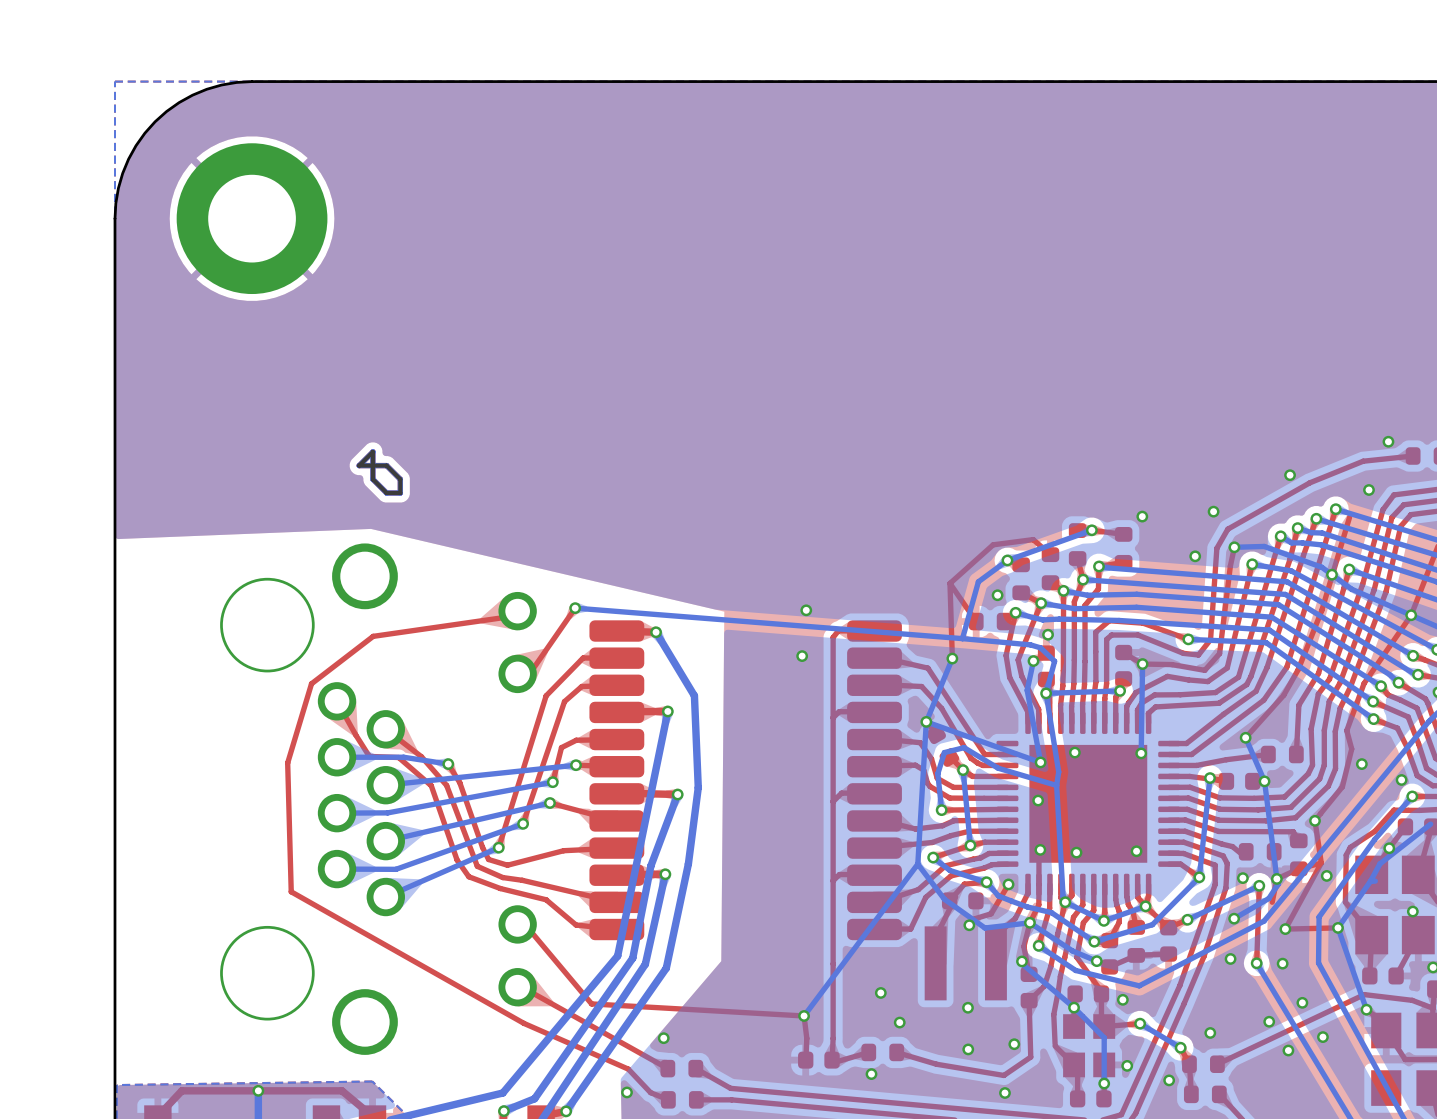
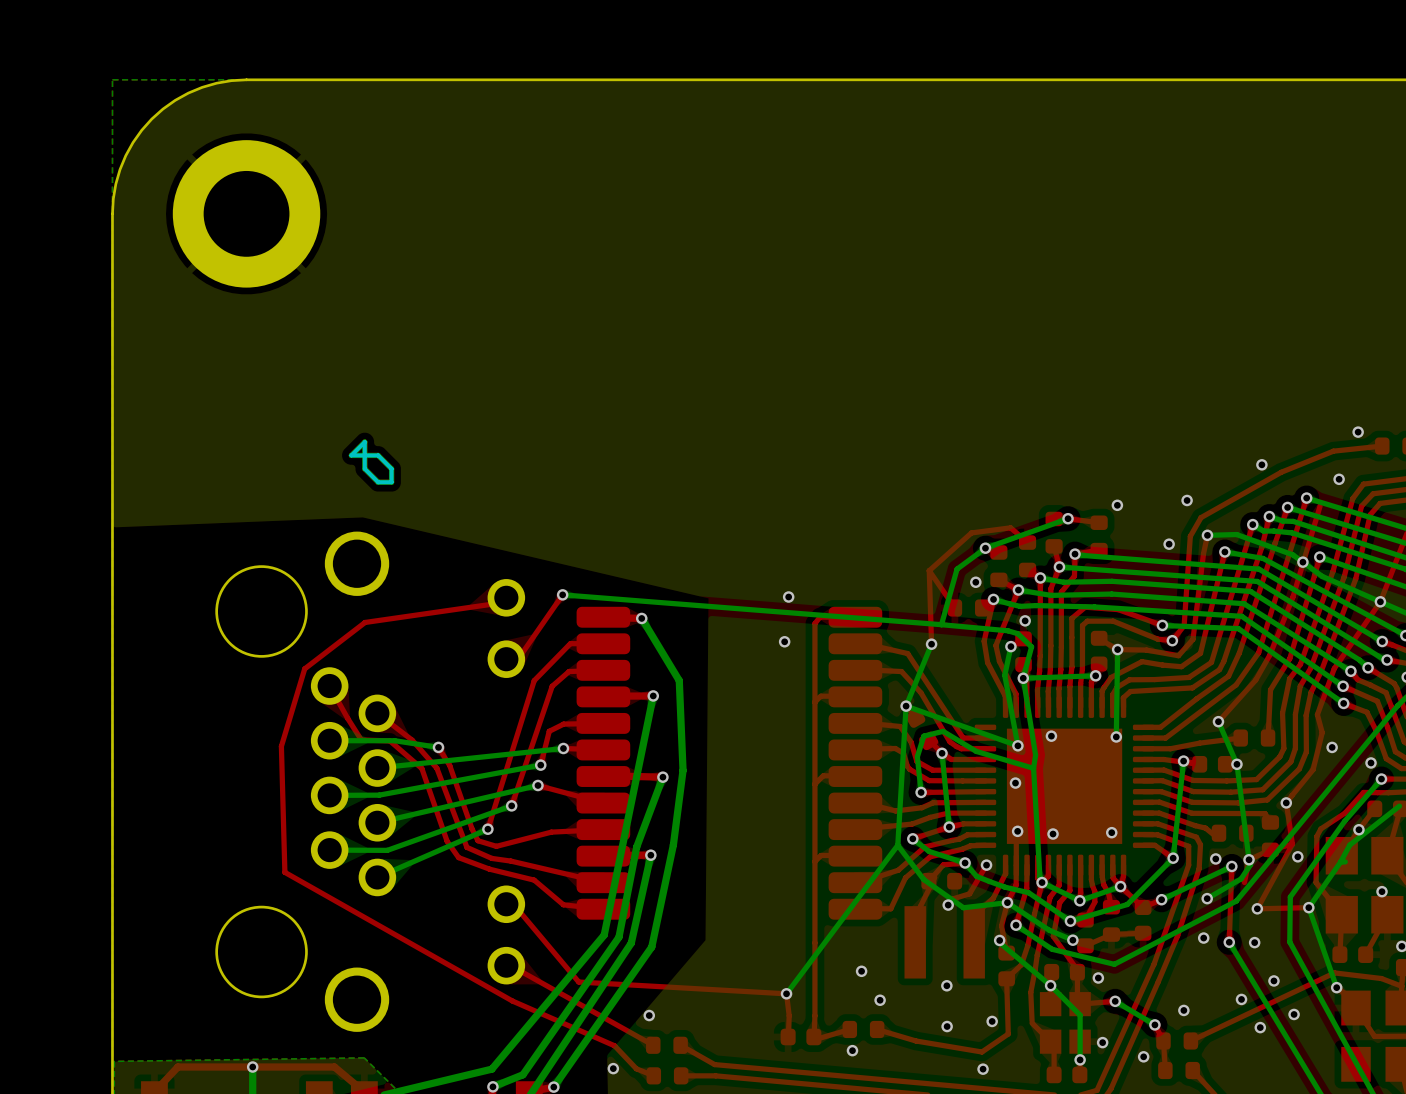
via: none -> (1172, 640)

